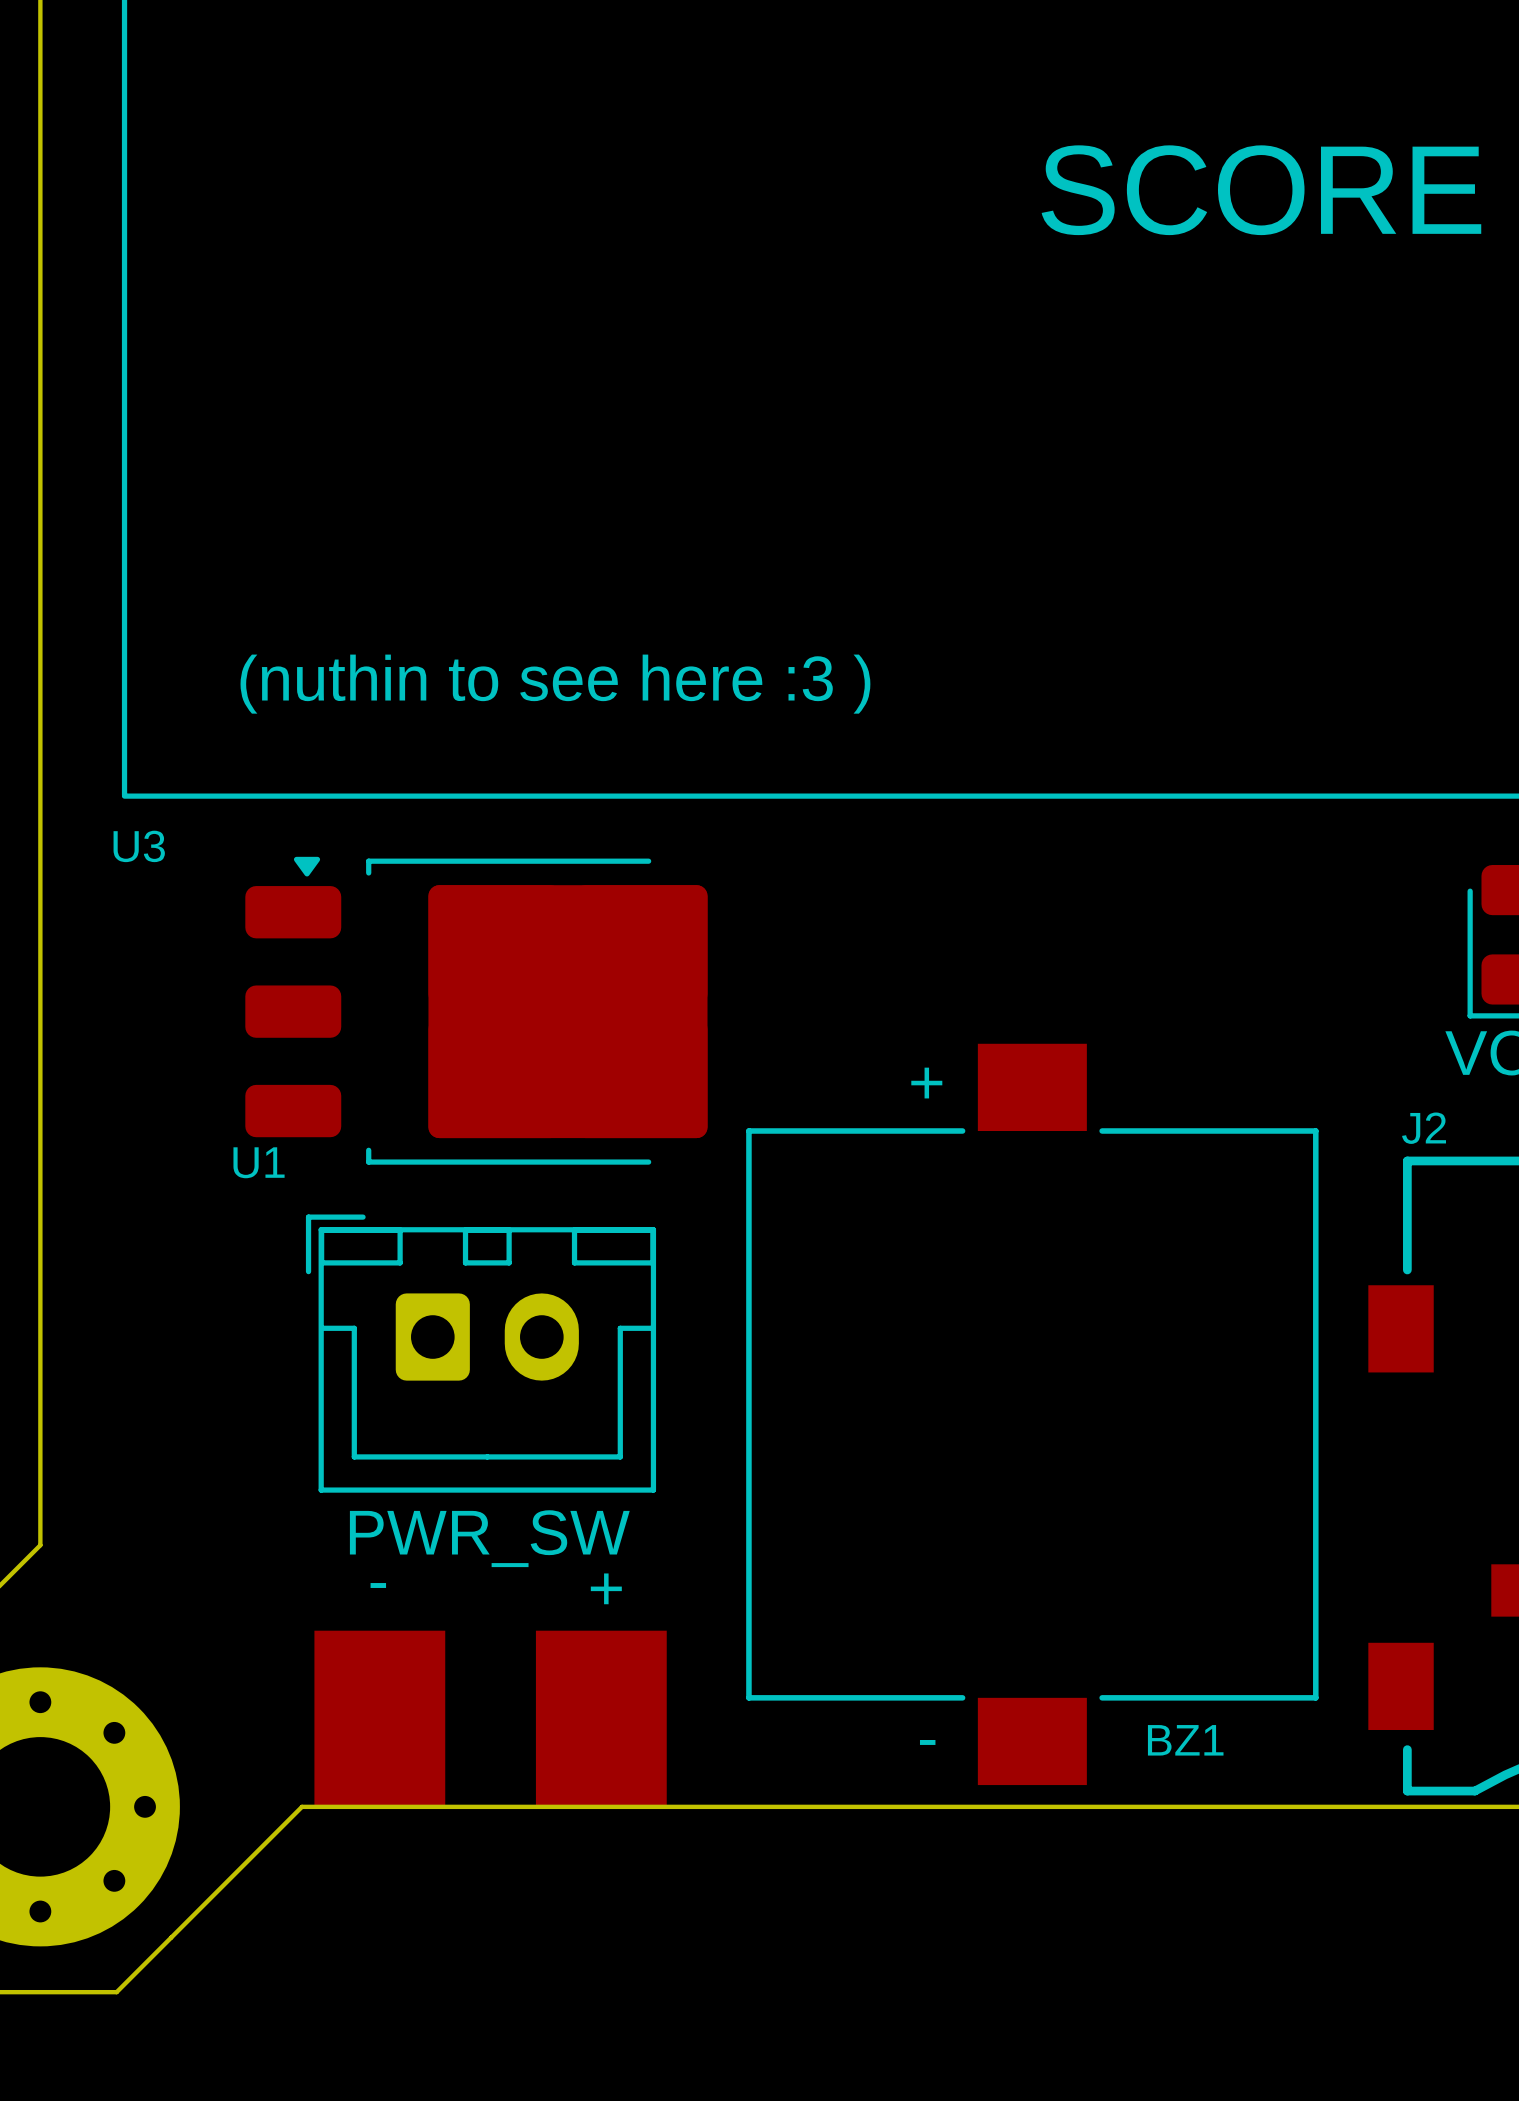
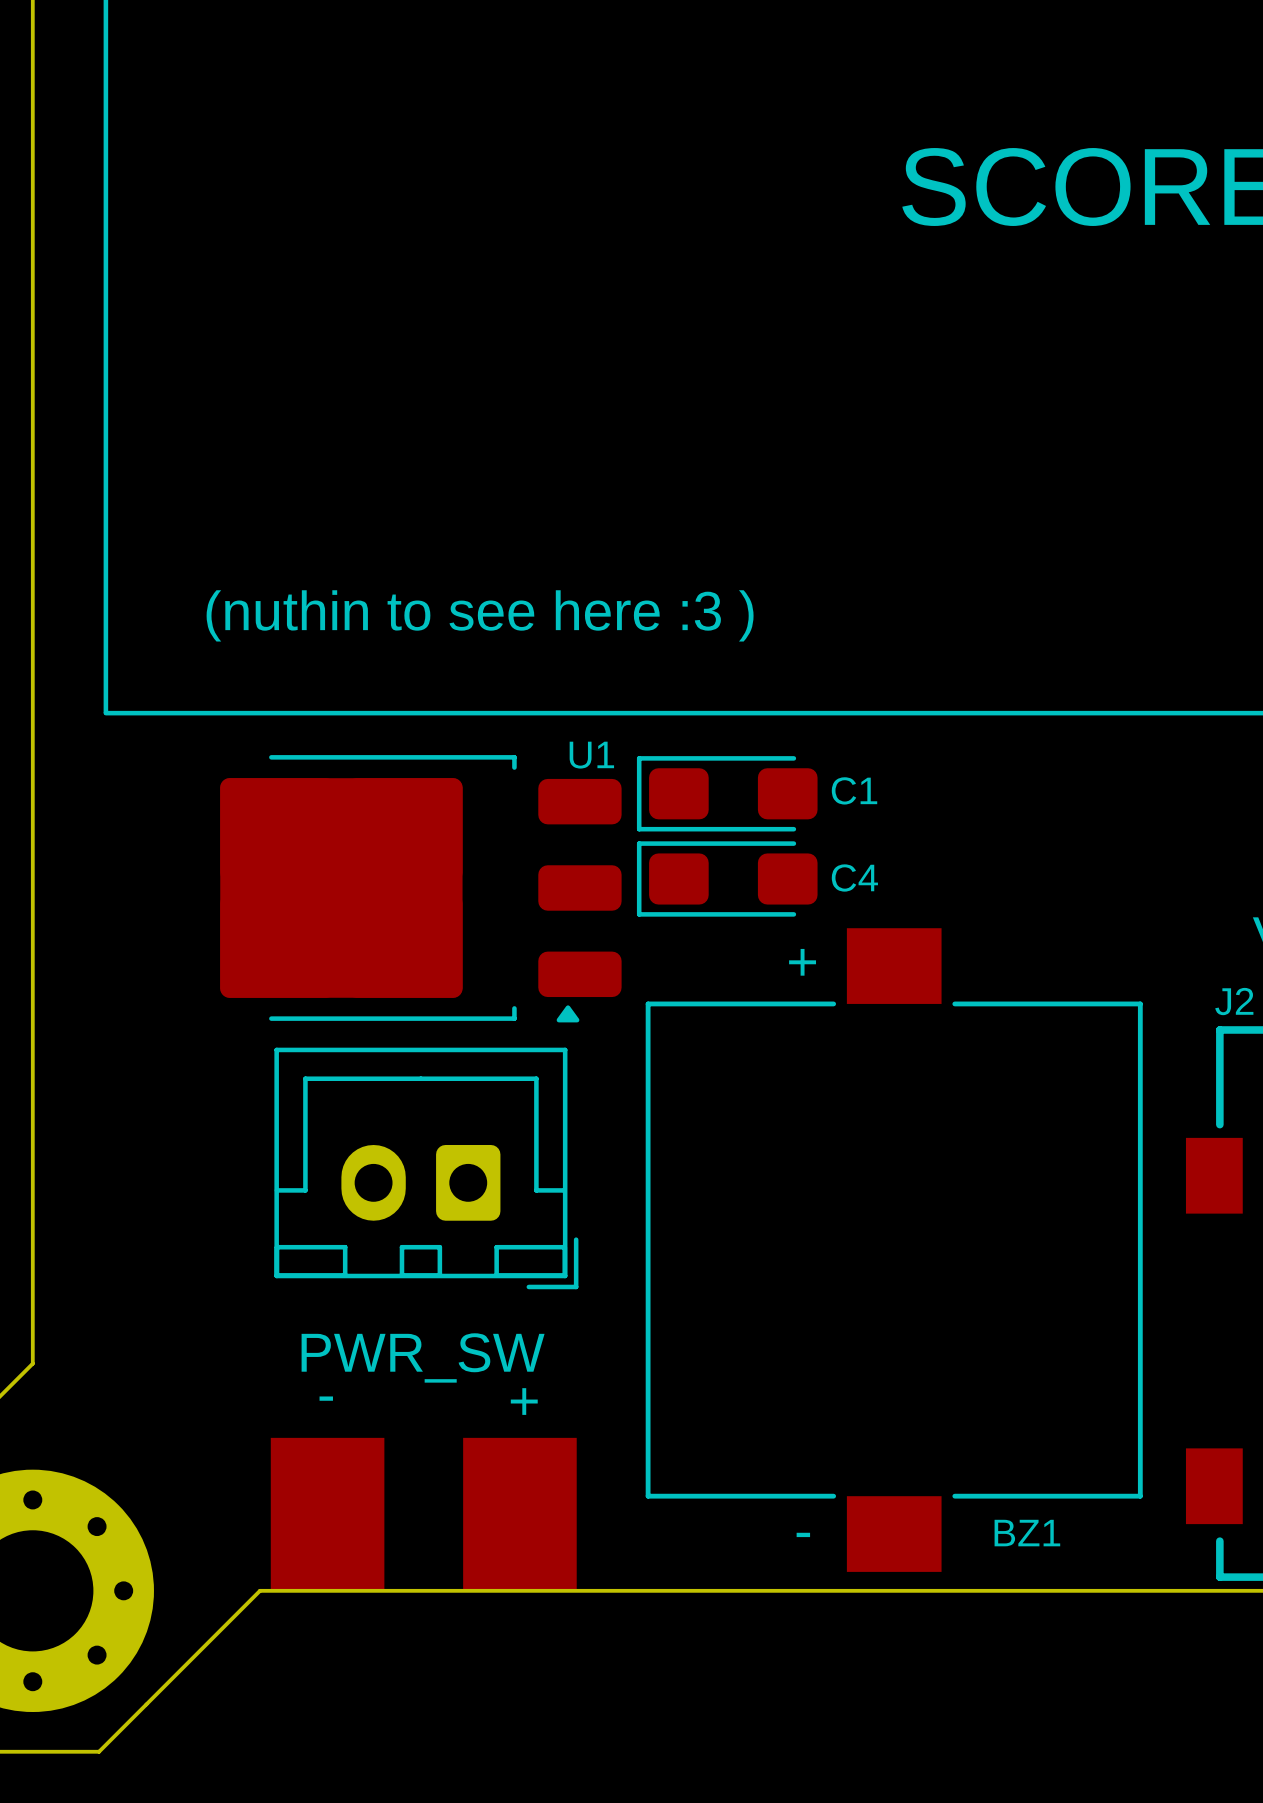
U3 name: U3 (139, 846) -> none
C1: none -> (727, 793)
C4: none -> (727, 878)
U1 rotation: 0° (476, 1010) -> 180° (420, 888)
part rotation: 0° (480, 1353) -> 180° (426, 1168)

